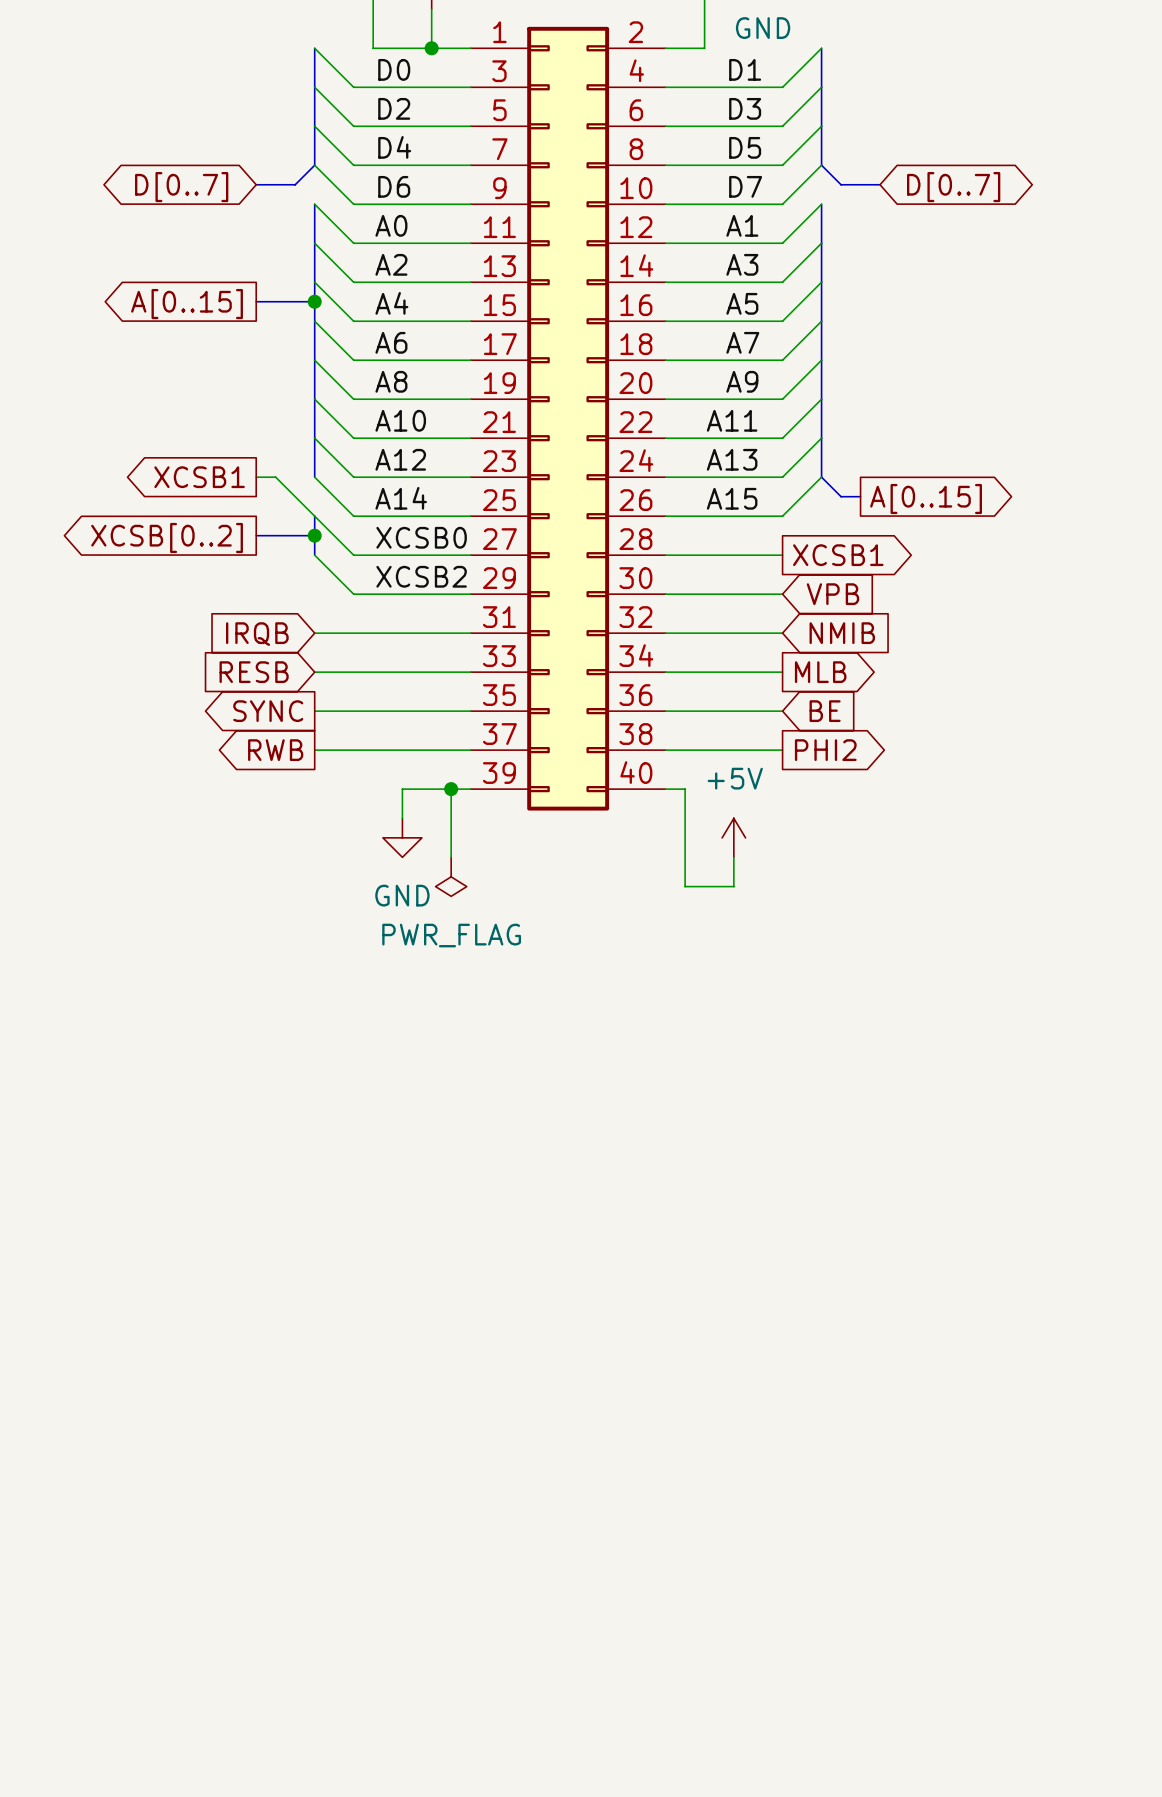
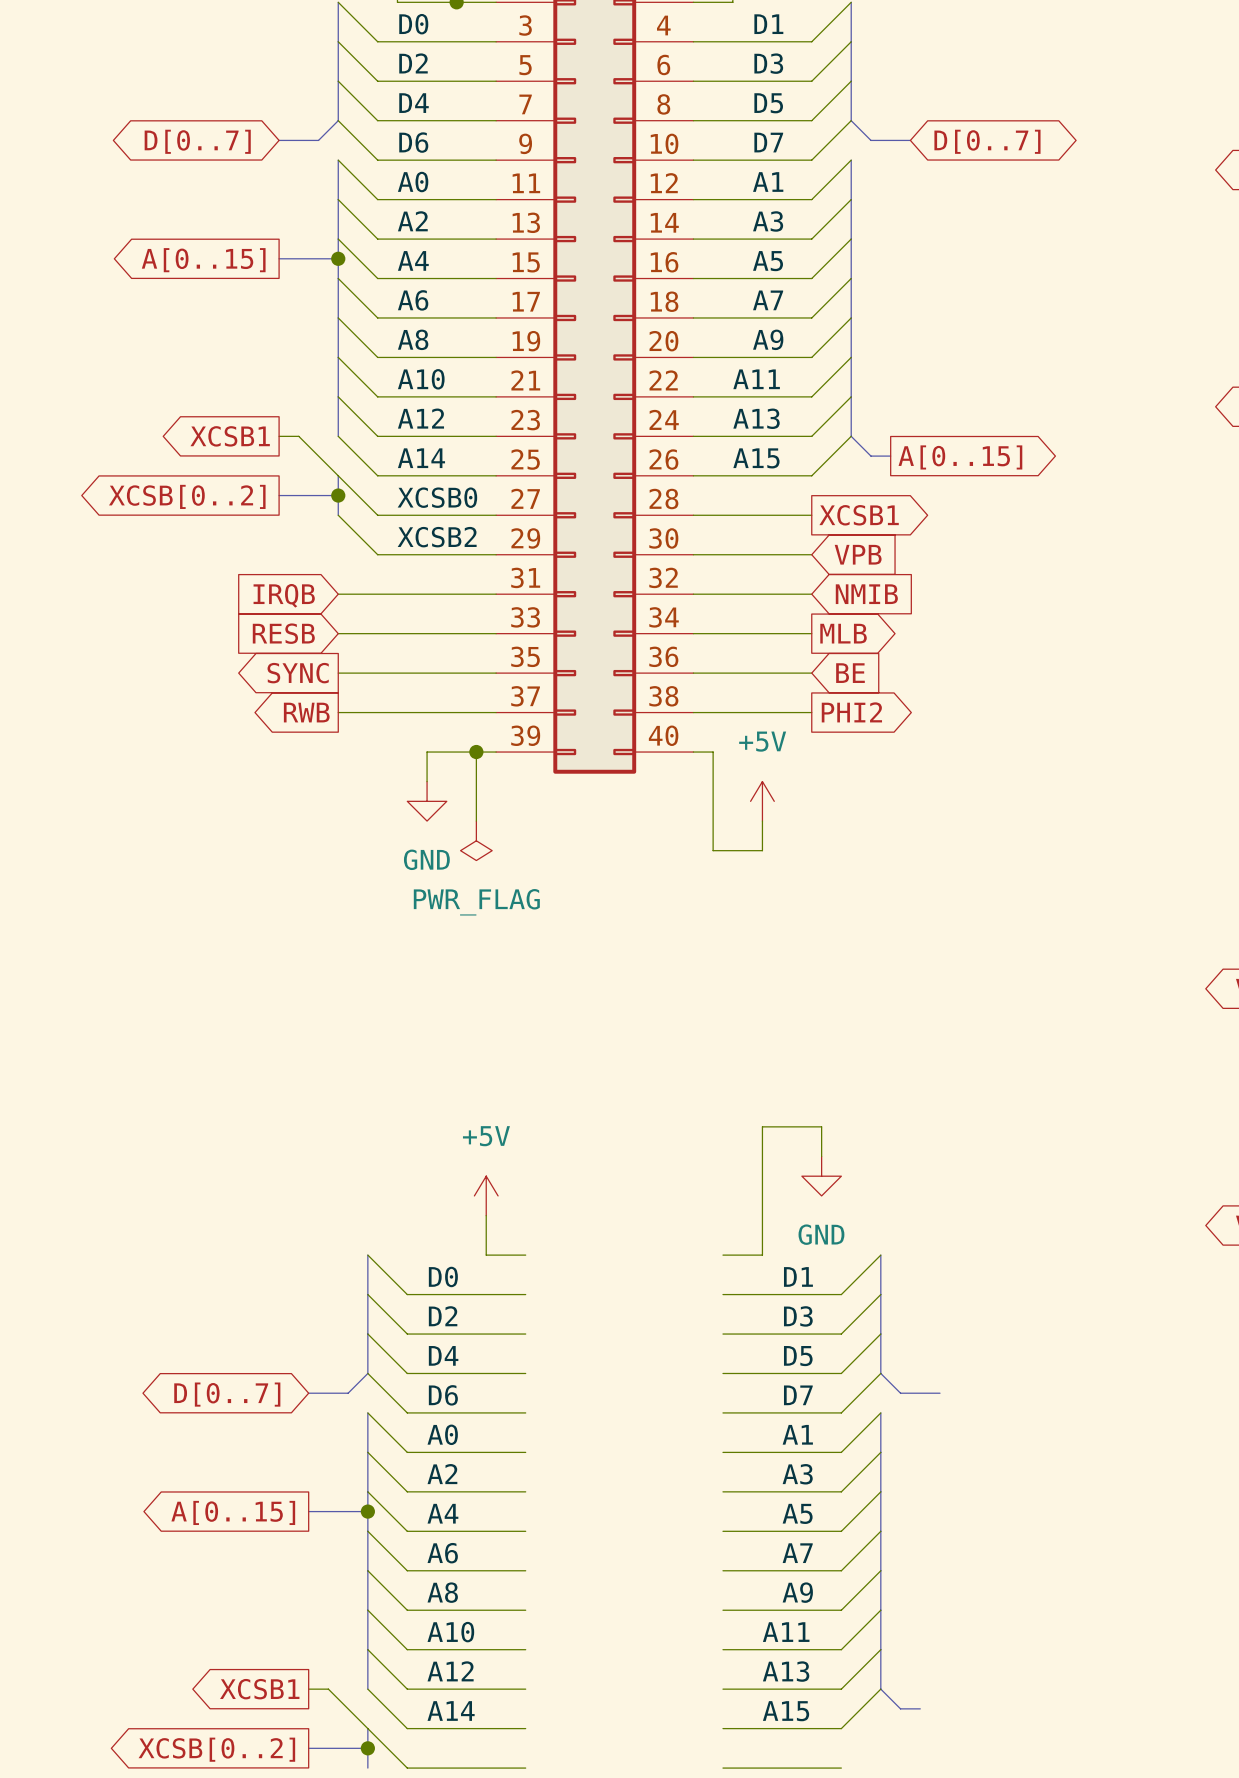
wire: none -> (821, 1156) (821, 1126) (762, 1126) (762, 1255) (722, 1255)
power symbol: none -> GND (821, 1176)
power symbol: none -> +5V (486, 1195)
wire: none -> (486, 1215) (486, 1255) (525, 1255)
wire: none -> (367, 1255) (407, 1294) (525, 1294)
bus: none -> (367, 1255) (367, 1373) (348, 1393) (308, 1393)
wire: none -> (880, 1255) (841, 1294) (722, 1294)
bus: none -> (880, 1255) (880, 1373) (900, 1393) (940, 1393)
label: none -> D0 (443, 1276)
label: none -> D1 (798, 1276)
wire: none -> (367, 1294) (407, 1334)
wire: none -> (880, 1294) (841, 1334)
label: none -> D2 (443, 1316)
label: none -> D3 (798, 1316)
wire: none -> (367, 1334) (407, 1373) (525, 1373)
wire: none -> (407, 1334) (525, 1334)
wire: none -> (722, 1334) (841, 1334)
wire: none -> (880, 1334) (841, 1373) (722, 1373)
label: none -> D4 (443, 1355)
label: none -> D5 (798, 1356)
wire: none -> (367, 1373) (407, 1412)
wire: none -> (880, 1373) (841, 1412) (722, 1412)
label: none -> D6 (443, 1395)
label: none -> D7 (798, 1395)
global label: none -> D[0..7] (227, 1394)
wire: none -> (367, 1412) (407, 1452) (525, 1452)
bus: none -> (367, 1412) (367, 1689)
wire: none -> (407, 1412) (525, 1412)
wire: none -> (880, 1412) (841, 1452) (722, 1452)
bus: none -> (880, 1412) (880, 1689) (900, 1708) (920, 1708)
label: none -> A0 (442, 1434)
label: none -> A1 (797, 1434)
wire: none -> (367, 1452) (407, 1491) (525, 1491)
wire: none -> (880, 1452) (841, 1491) (722, 1491)
label: none -> A2 (442, 1474)
label: none -> A3 (797, 1474)
wire: none -> (367, 1491) (407, 1531)
wire: none -> (880, 1491) (841, 1531) (722, 1531)
bus: none -> (308, 1511) (367, 1511)
junction: none -> (367, 1511)
label: none -> A4 (442, 1513)
label: none -> A5 (797, 1513)
global label: none -> A[0..15] (233, 1512)
wire: none -> (367, 1531) (407, 1570) (525, 1570)
wire: none -> (407, 1531) (525, 1531)
wire: none -> (880, 1531) (841, 1570) (722, 1570)
label: none -> A6 (442, 1553)
label: none -> A7 (797, 1553)
wire: none -> (367, 1570) (407, 1610) (525, 1610)
wire: none -> (880, 1570) (841, 1610) (722, 1610)
label: none -> A8 (442, 1592)
label: none -> A9 (797, 1592)
wire: none -> (367, 1610) (407, 1649) (525, 1649)
wire: none -> (880, 1610) (841, 1649) (722, 1649)
label: none -> A10 (450, 1632)
label: none -> A11 (786, 1632)
wire: none -> (367, 1649) (407, 1689)
wire: none -> (880, 1649) (841, 1689) (722, 1689)
label: none -> A12 (450, 1671)
label: none -> A13 (786, 1671)
global label: none -> XCSB1 (259, 1689)
wire: none -> (308, 1689) (328, 1689) (407, 1768) (525, 1768)
wire: none -> (367, 1689) (407, 1728) (525, 1728)
wire: none -> (407, 1689) (525, 1689)
wire: none -> (880, 1689) (841, 1728) (722, 1728)
label: none -> A14 (451, 1711)
label: none -> A15 (786, 1711)
bus: none -> (367, 1728) (367, 1768)
bus: none -> (308, 1748) (367, 1748)
junction: none -> (367, 1748)
global label: none -> XCSB[0..2] (216, 1749)
wire: none -> (722, 1768) (841, 1768)

